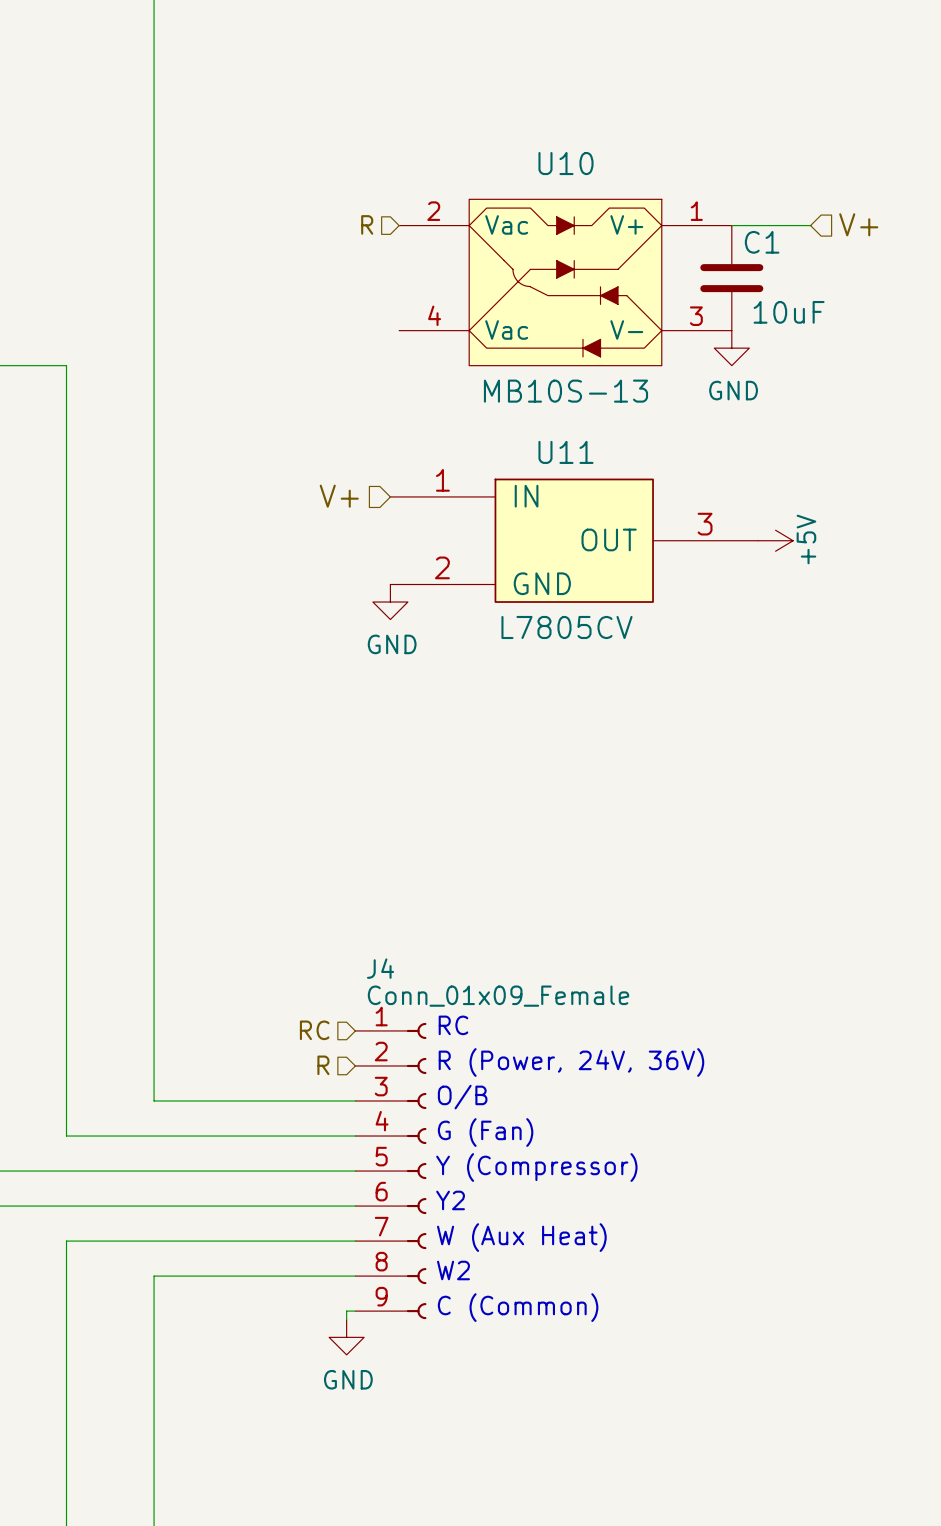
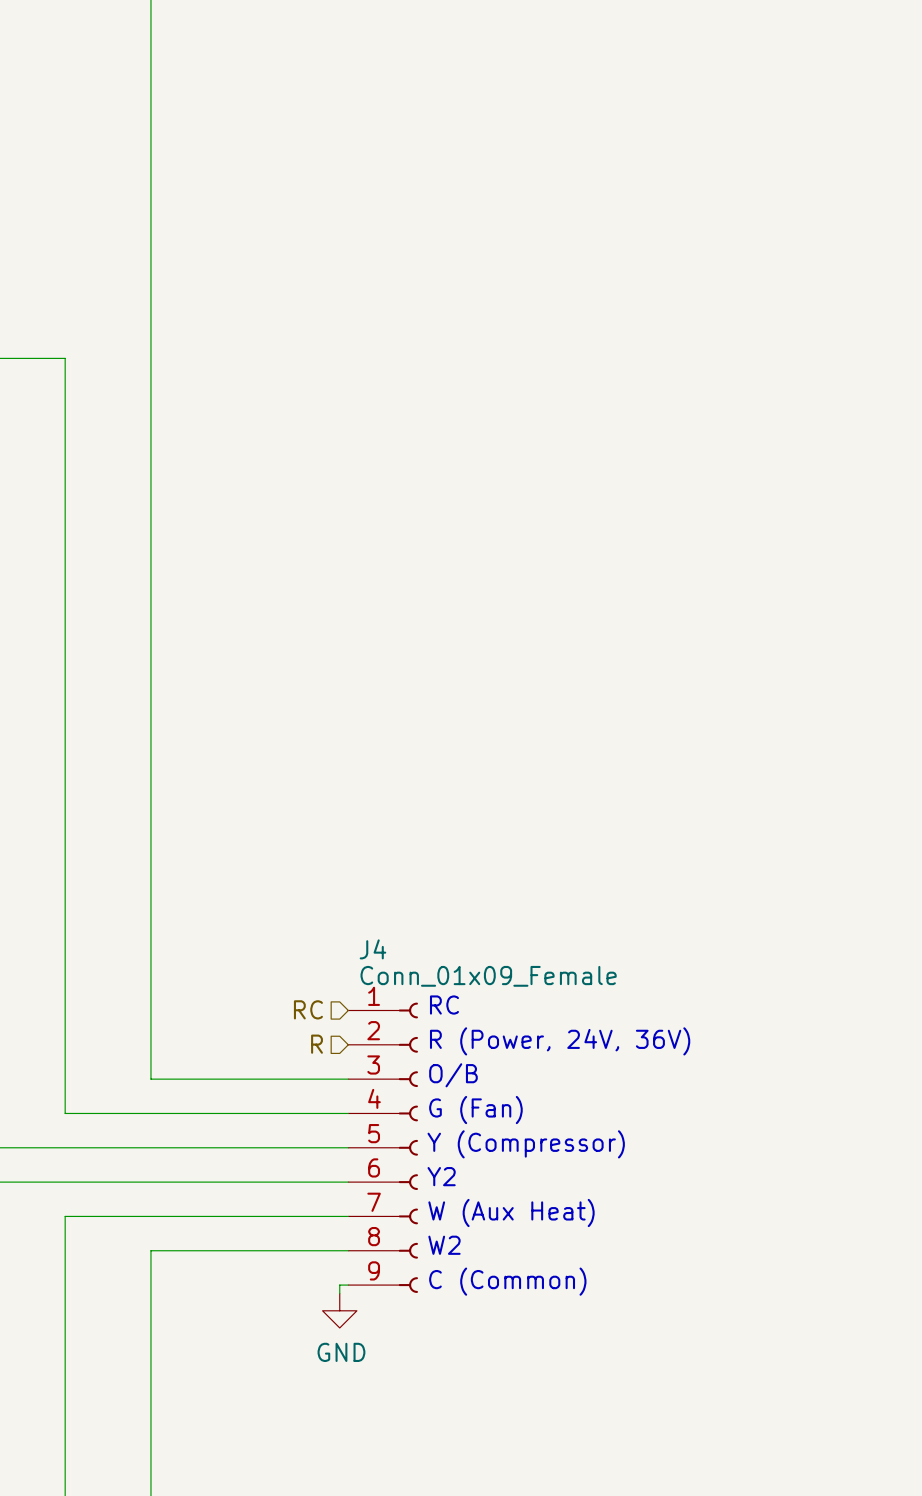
hierarchical label: R (367, 224) -> none
hierarchical label: V+ (858, 224) -> none
wire: (731, 225) (810, 225) -> none
C1: 10uF (731, 278) -> none
U10: MB10S-13 (565, 282) -> none
power symbol: GND (731, 348) -> none
hierarchical label: V+ (339, 496) -> none
U11: L7805CV (574, 540) -> none
power symbol: +5V (775, 540) -> none
power symbol: GND (390, 602) -> none

